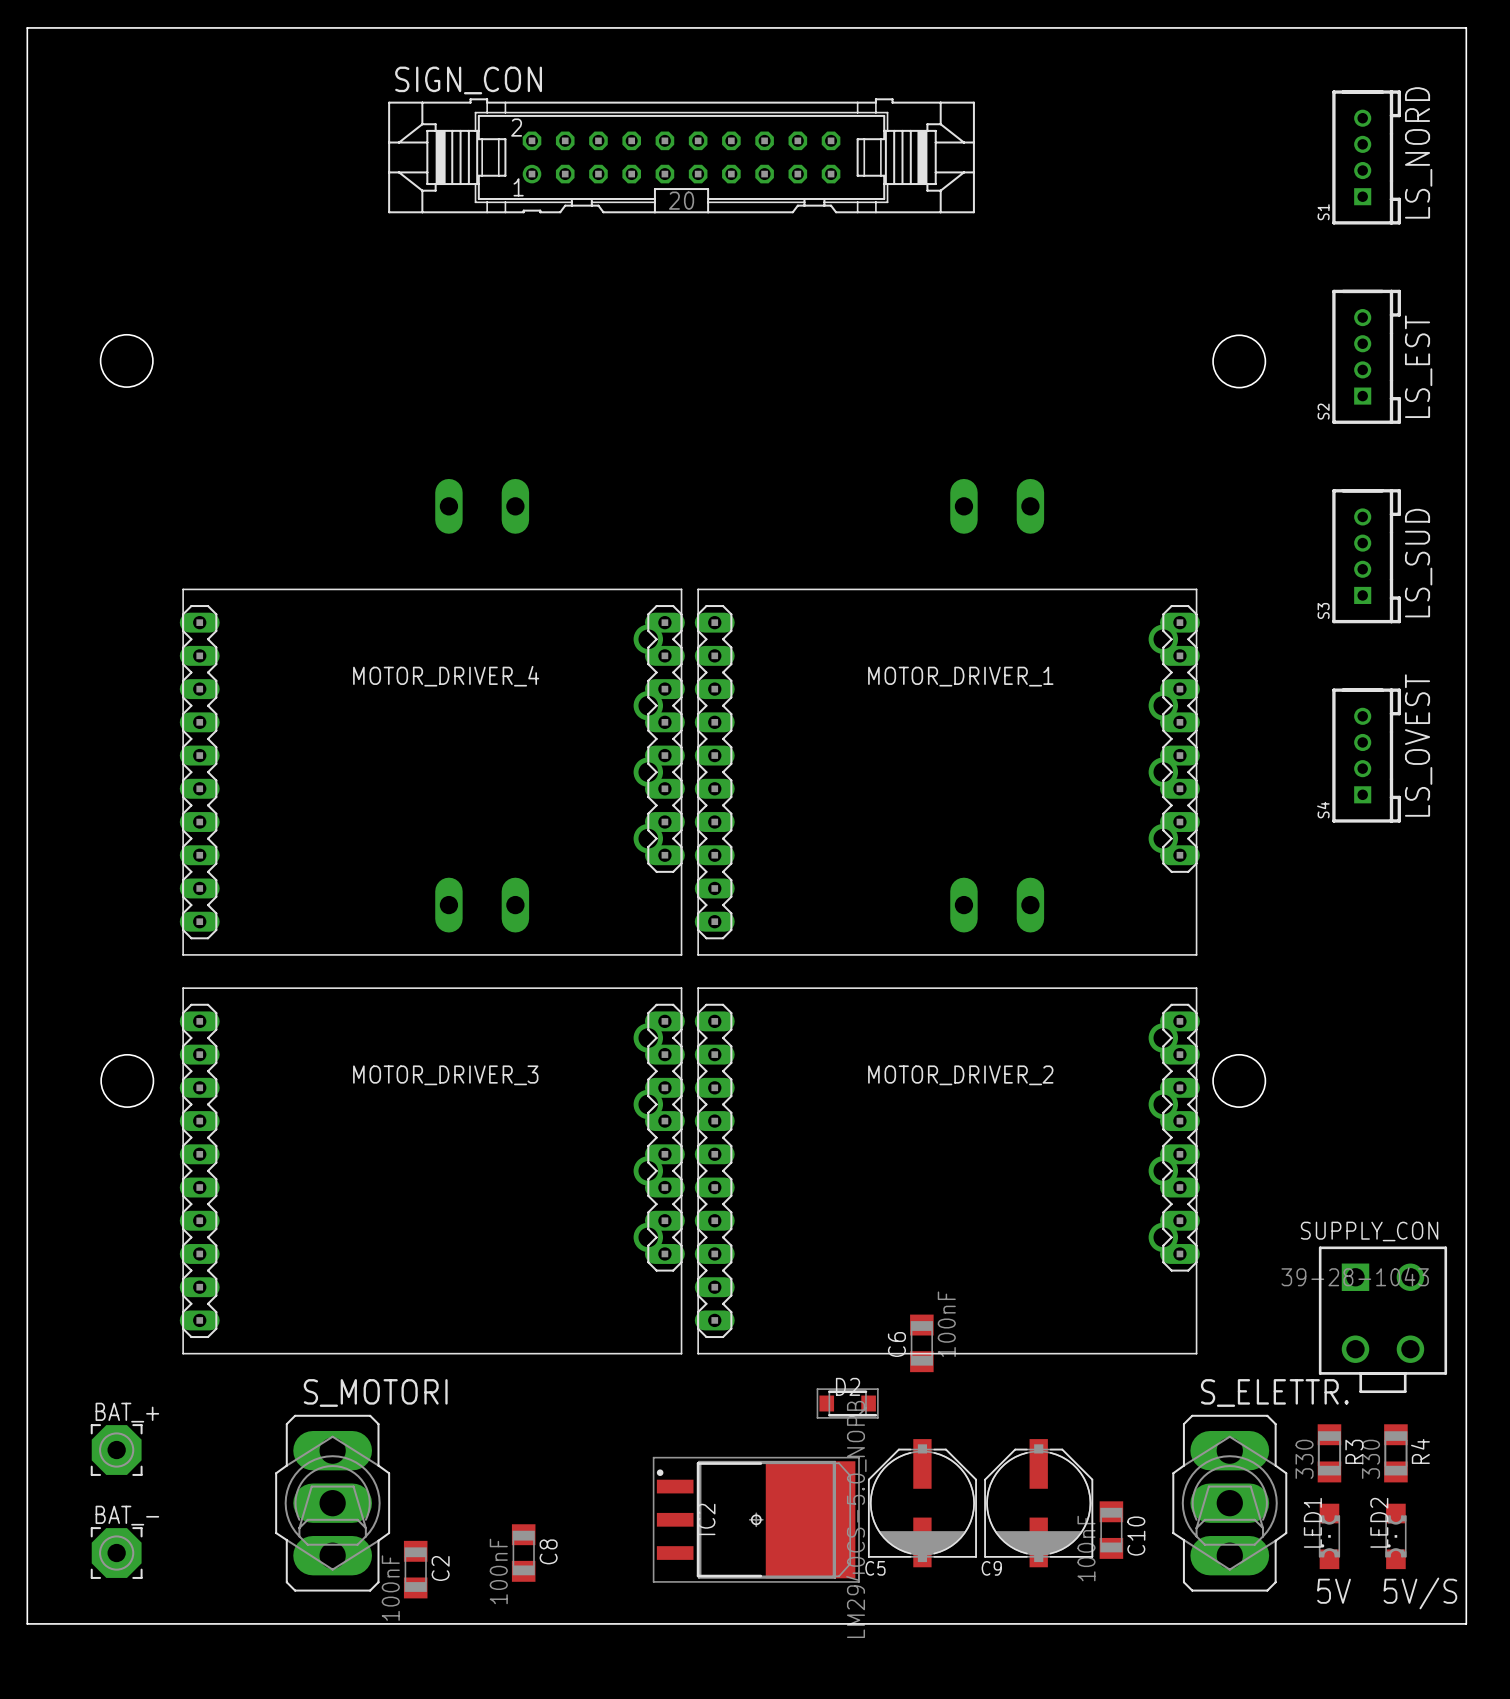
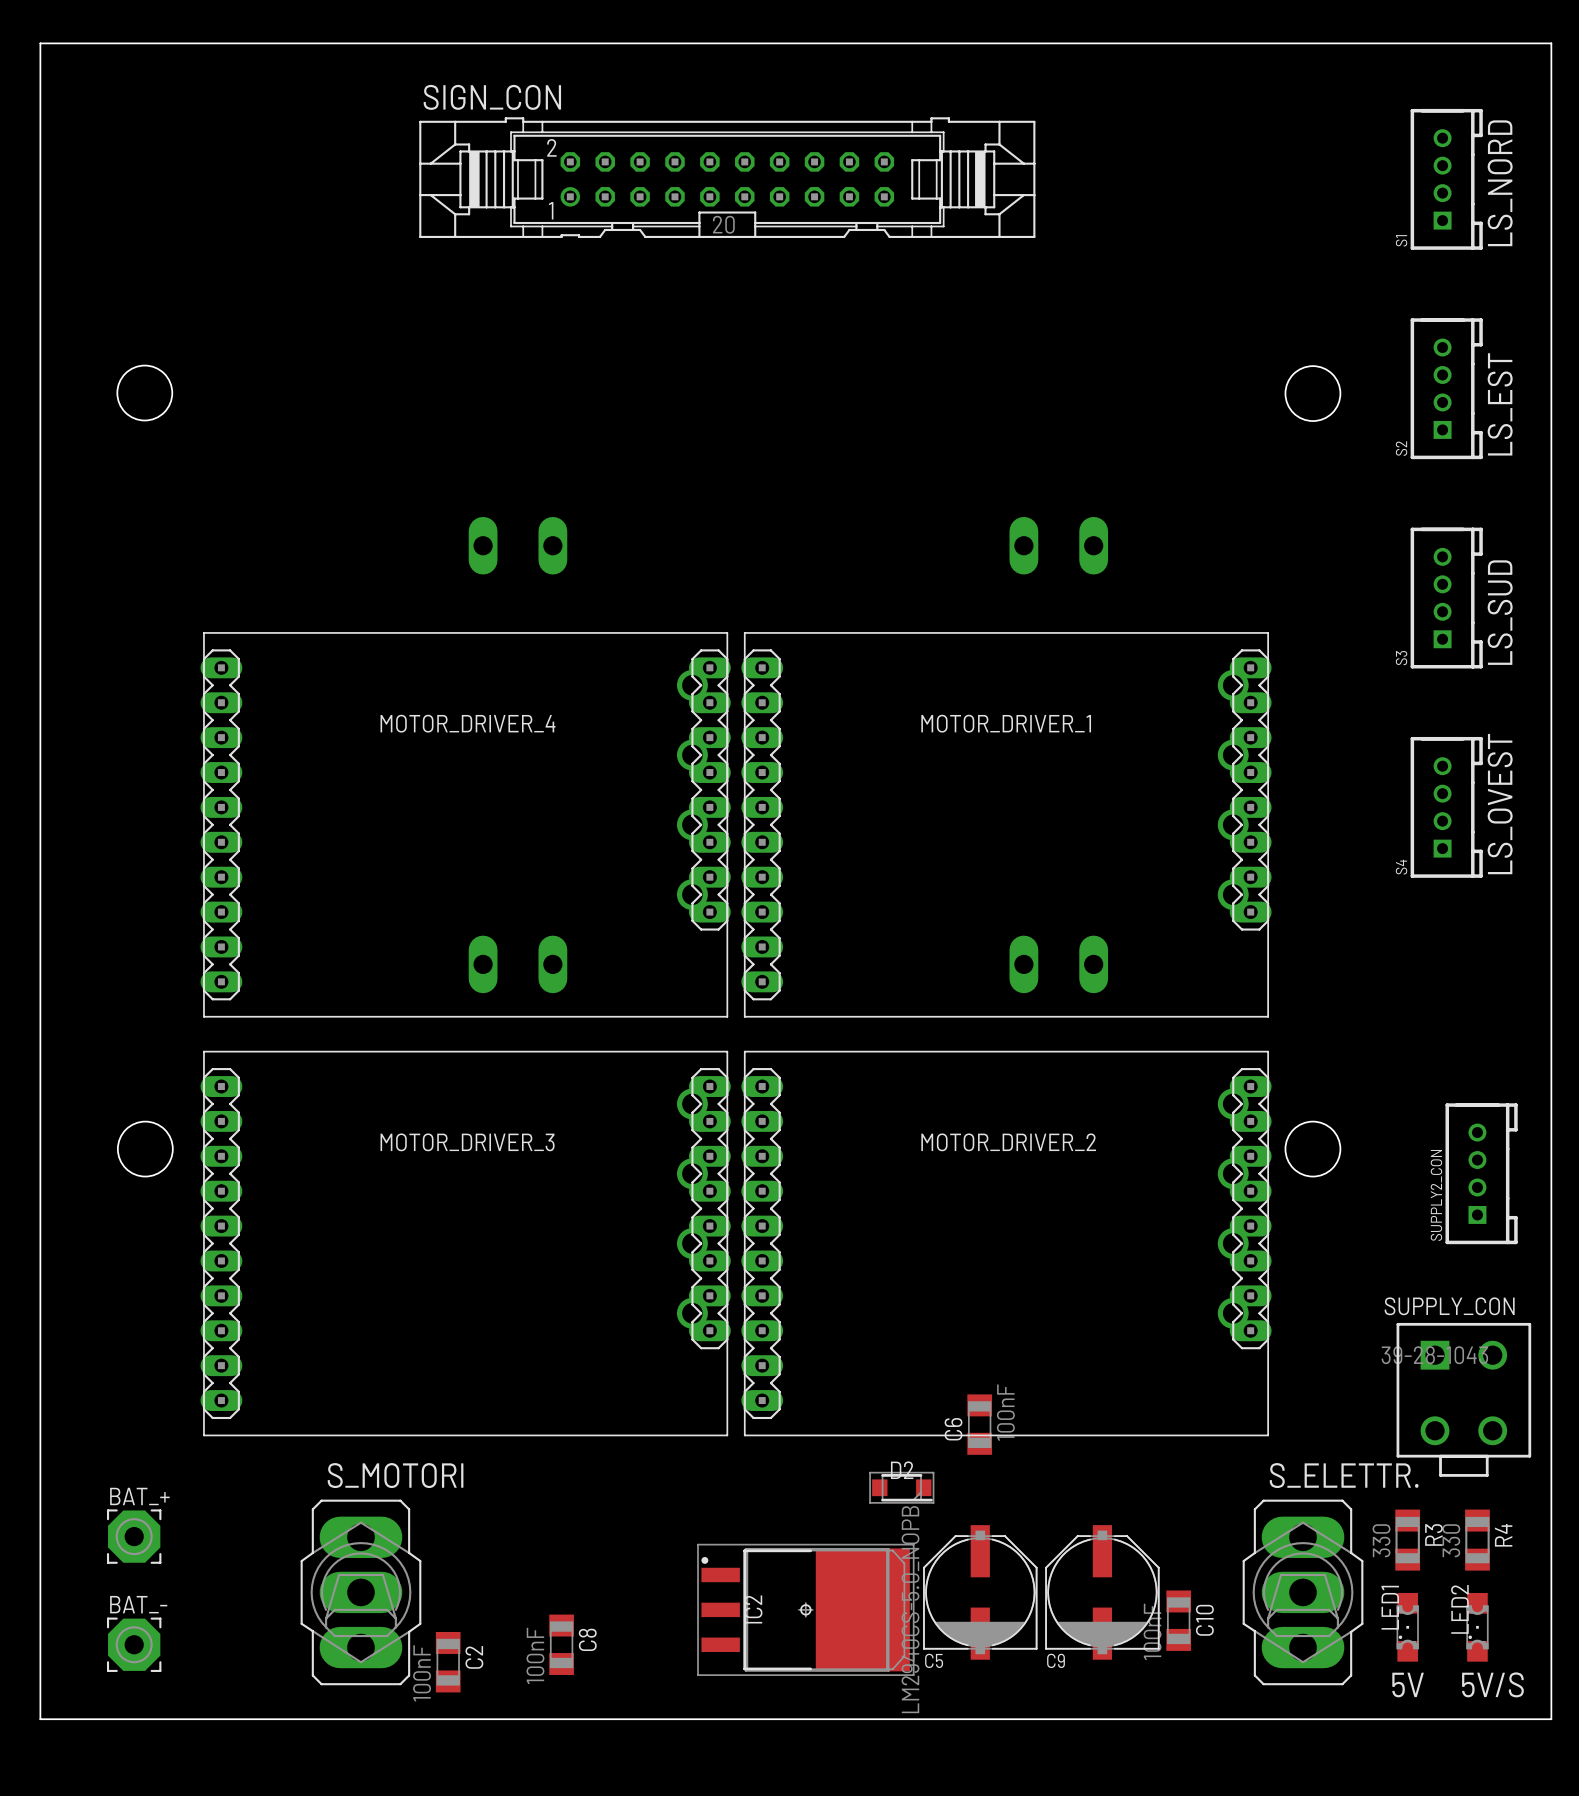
SUPPLY2_CON: none -> (1481, 1173)

